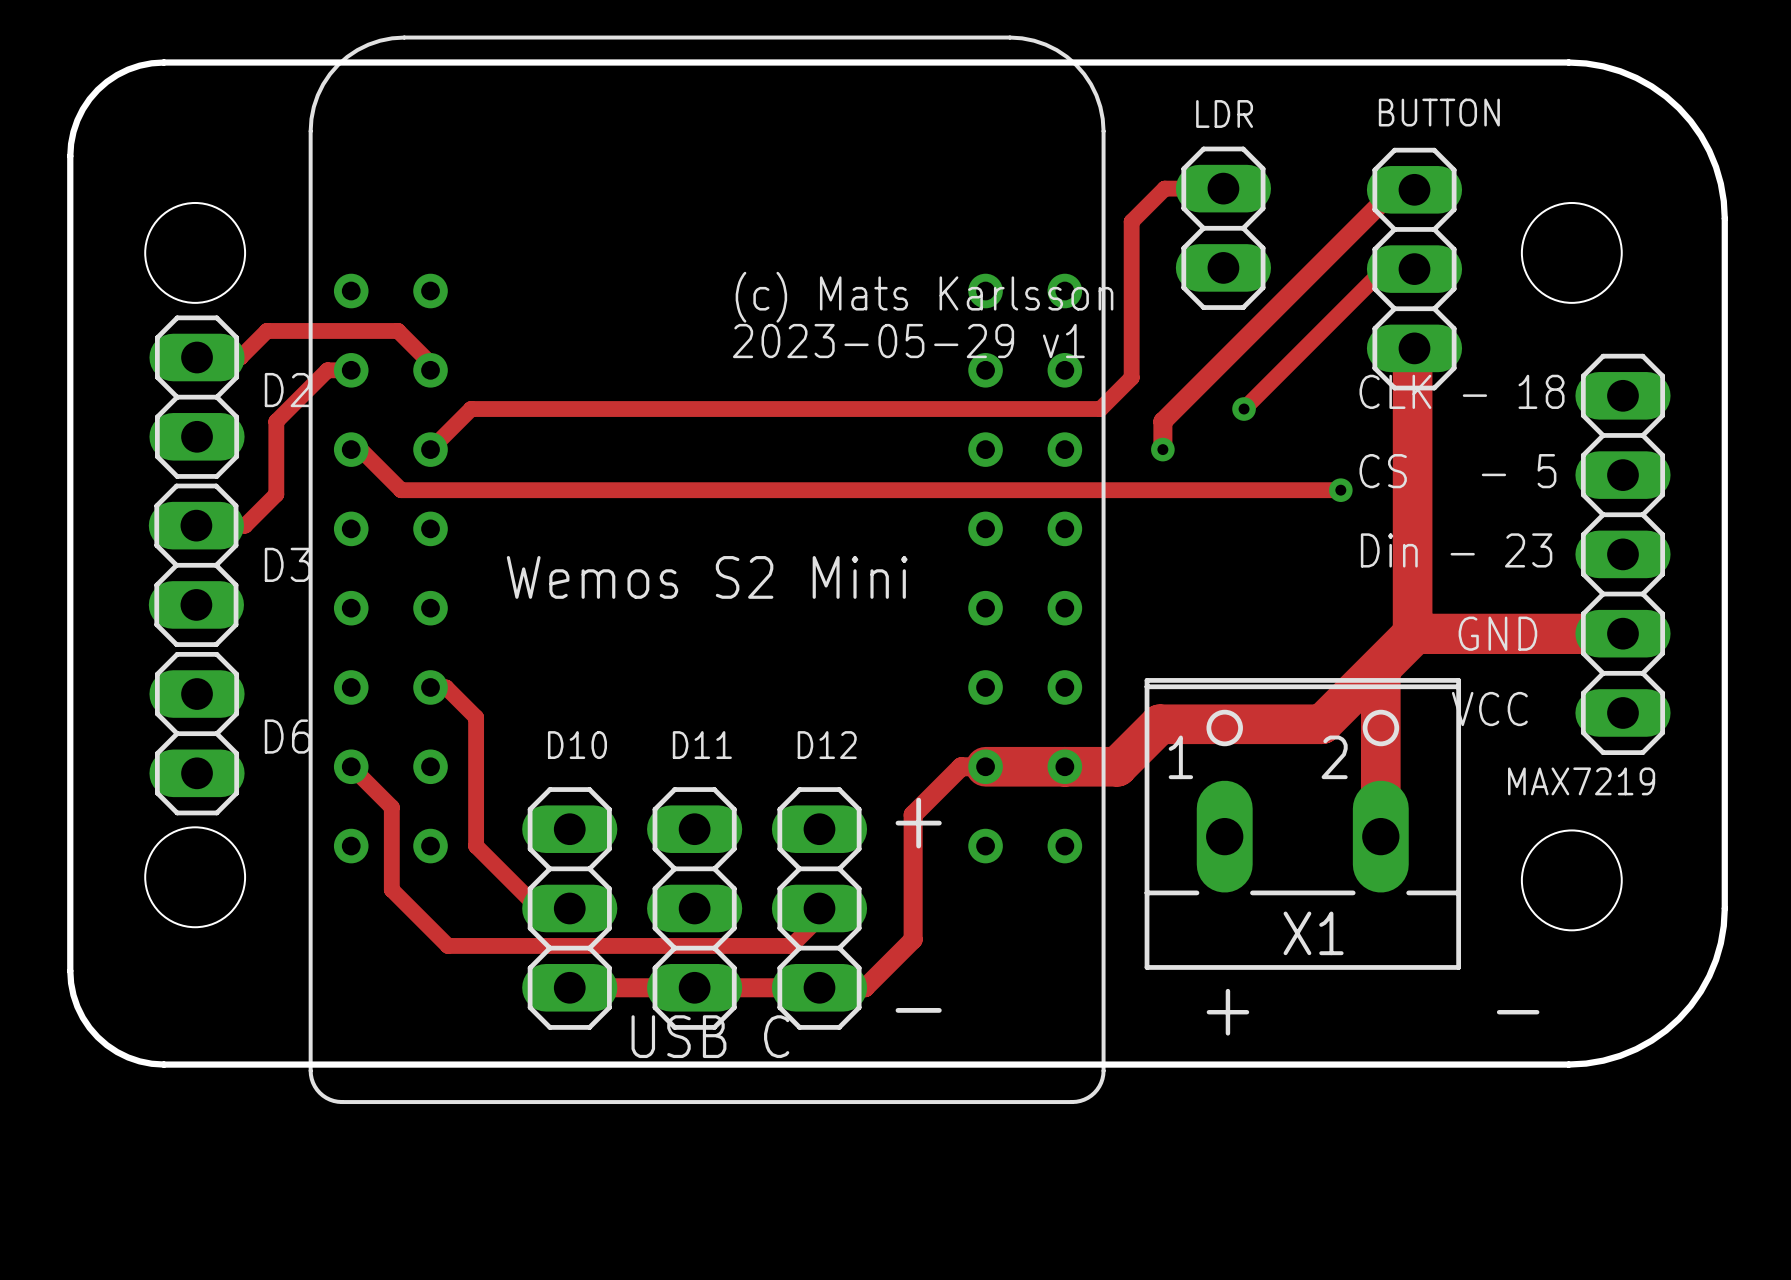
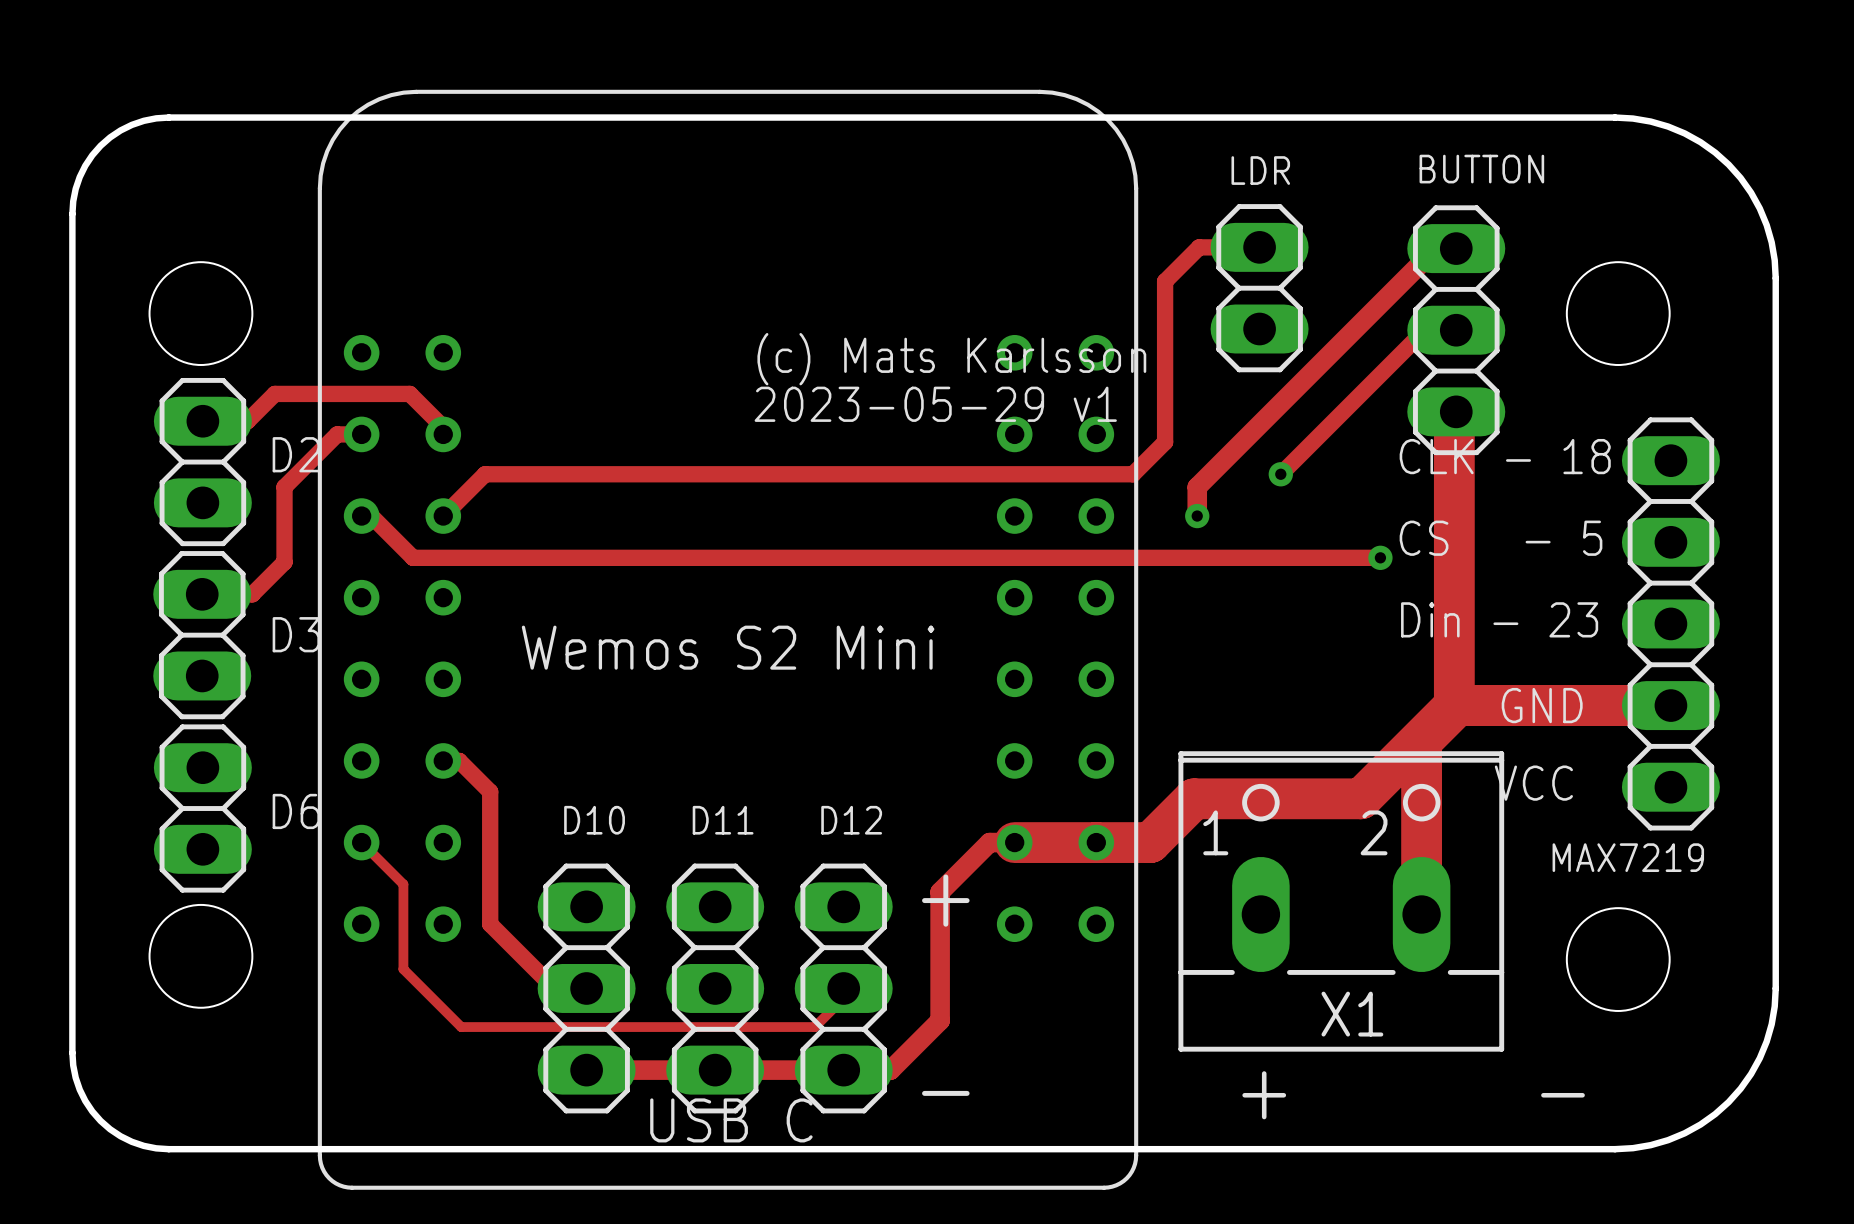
track width: thick (351, 766) (391, 807) (391, 889) (448, 945) (791, 945) (819, 917) (819, 908) -> thin (361, 842) (403, 884) (403, 969) (461, 1027) (814, 1027) (843, 998) (843, 988)

